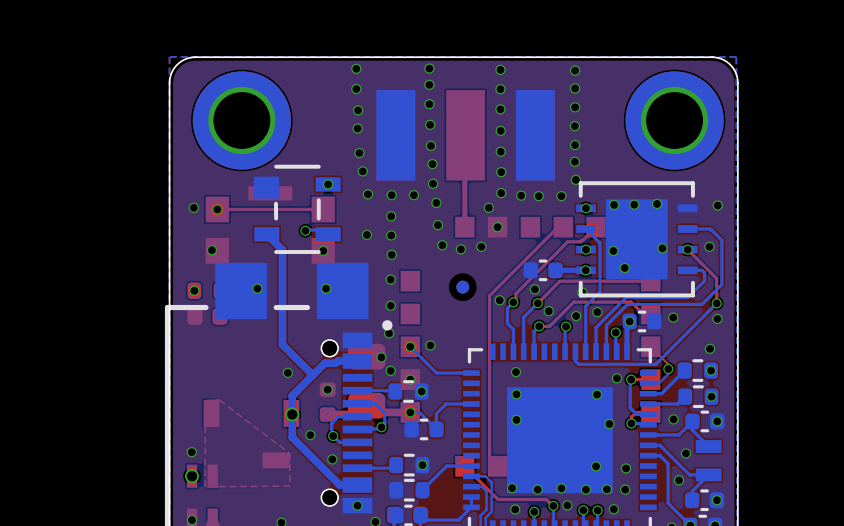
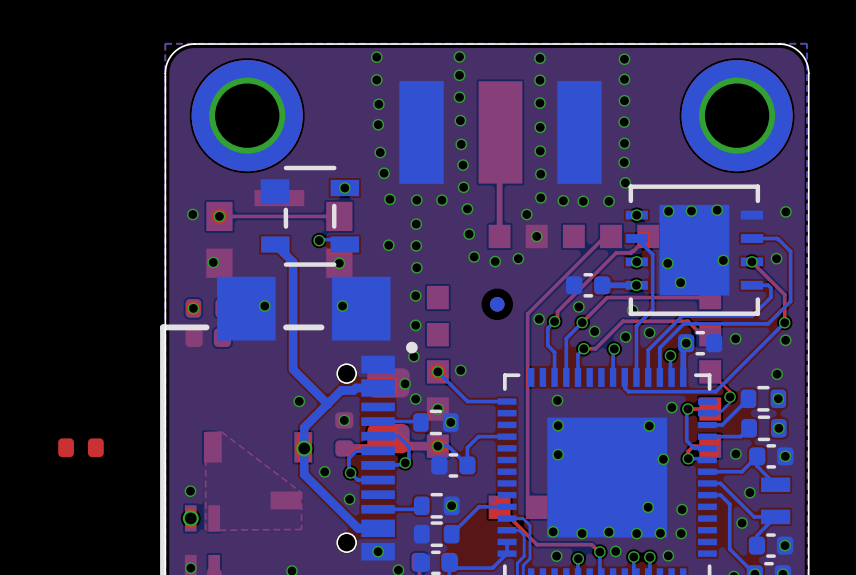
part: none -> (80, 447)

